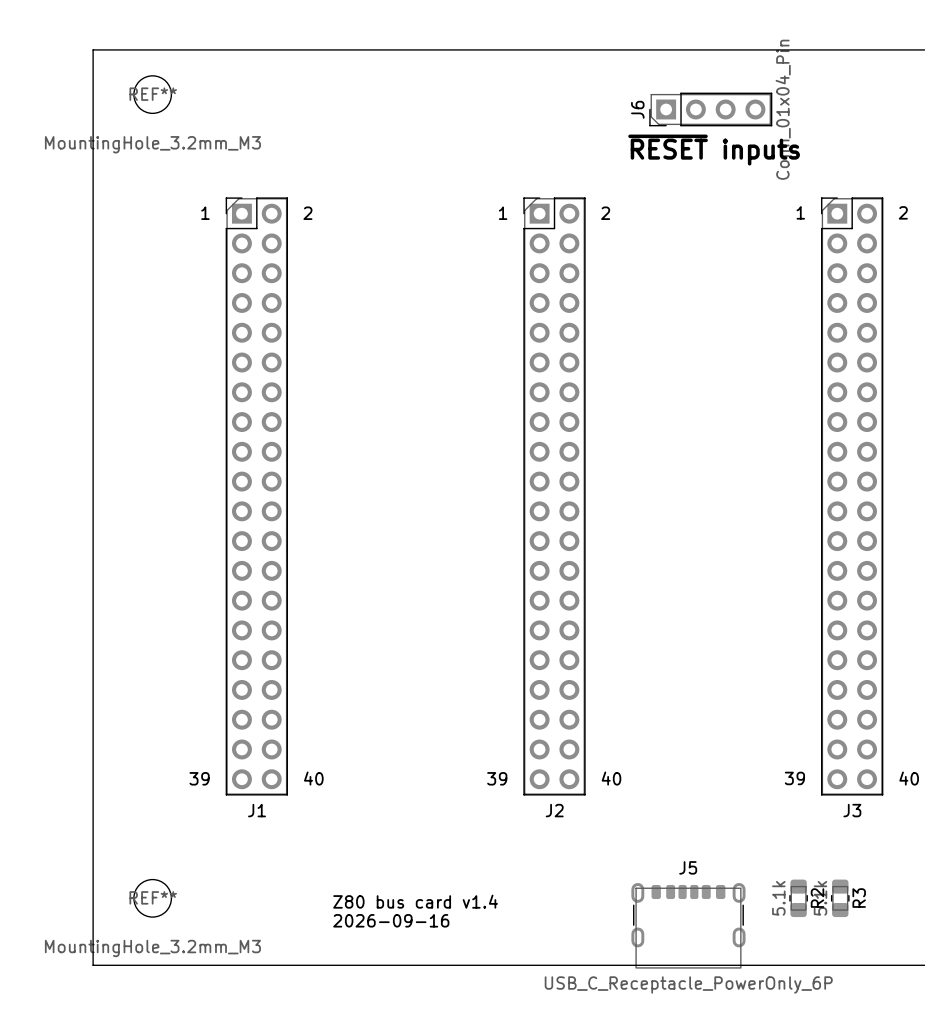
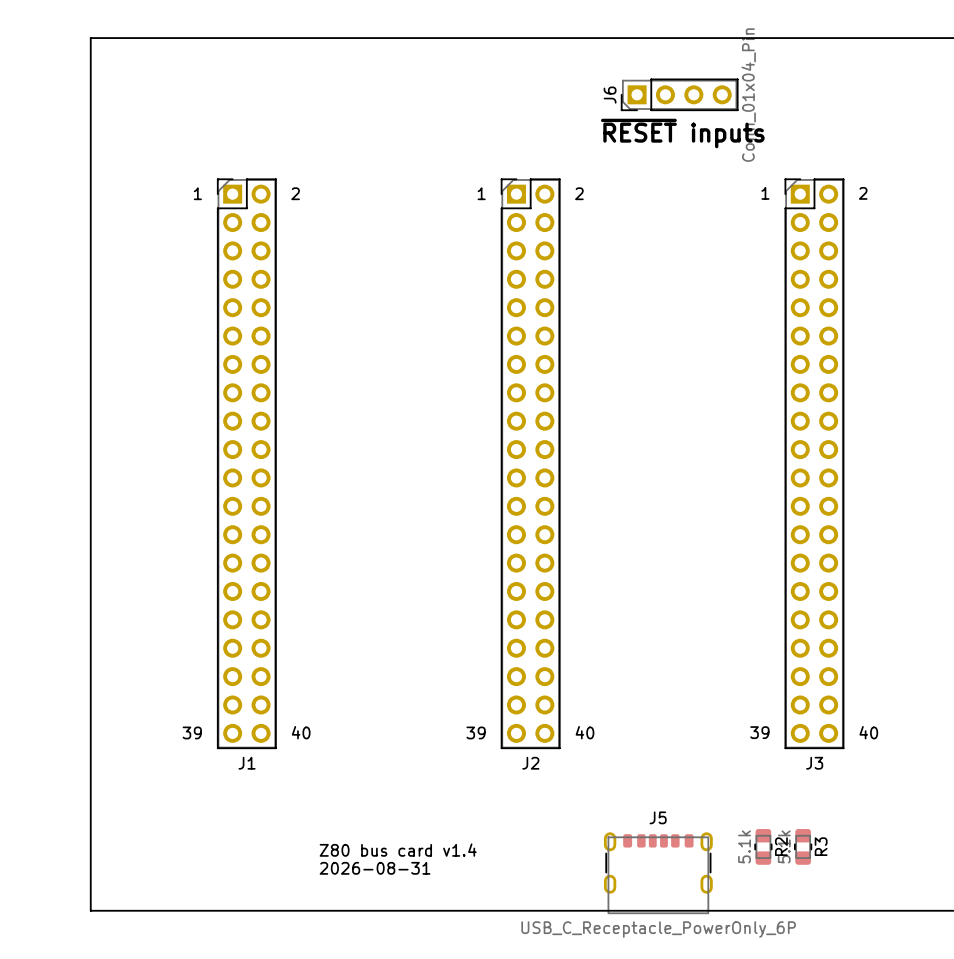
REF**: MountingHole_3.2mm_M3 (152, 94) -> none
REF**: MountingHole_3.2mm_M3 (152, 898) -> none
text: 2026-09-16 (391, 920) -> 2026-08-31 (375, 868)

